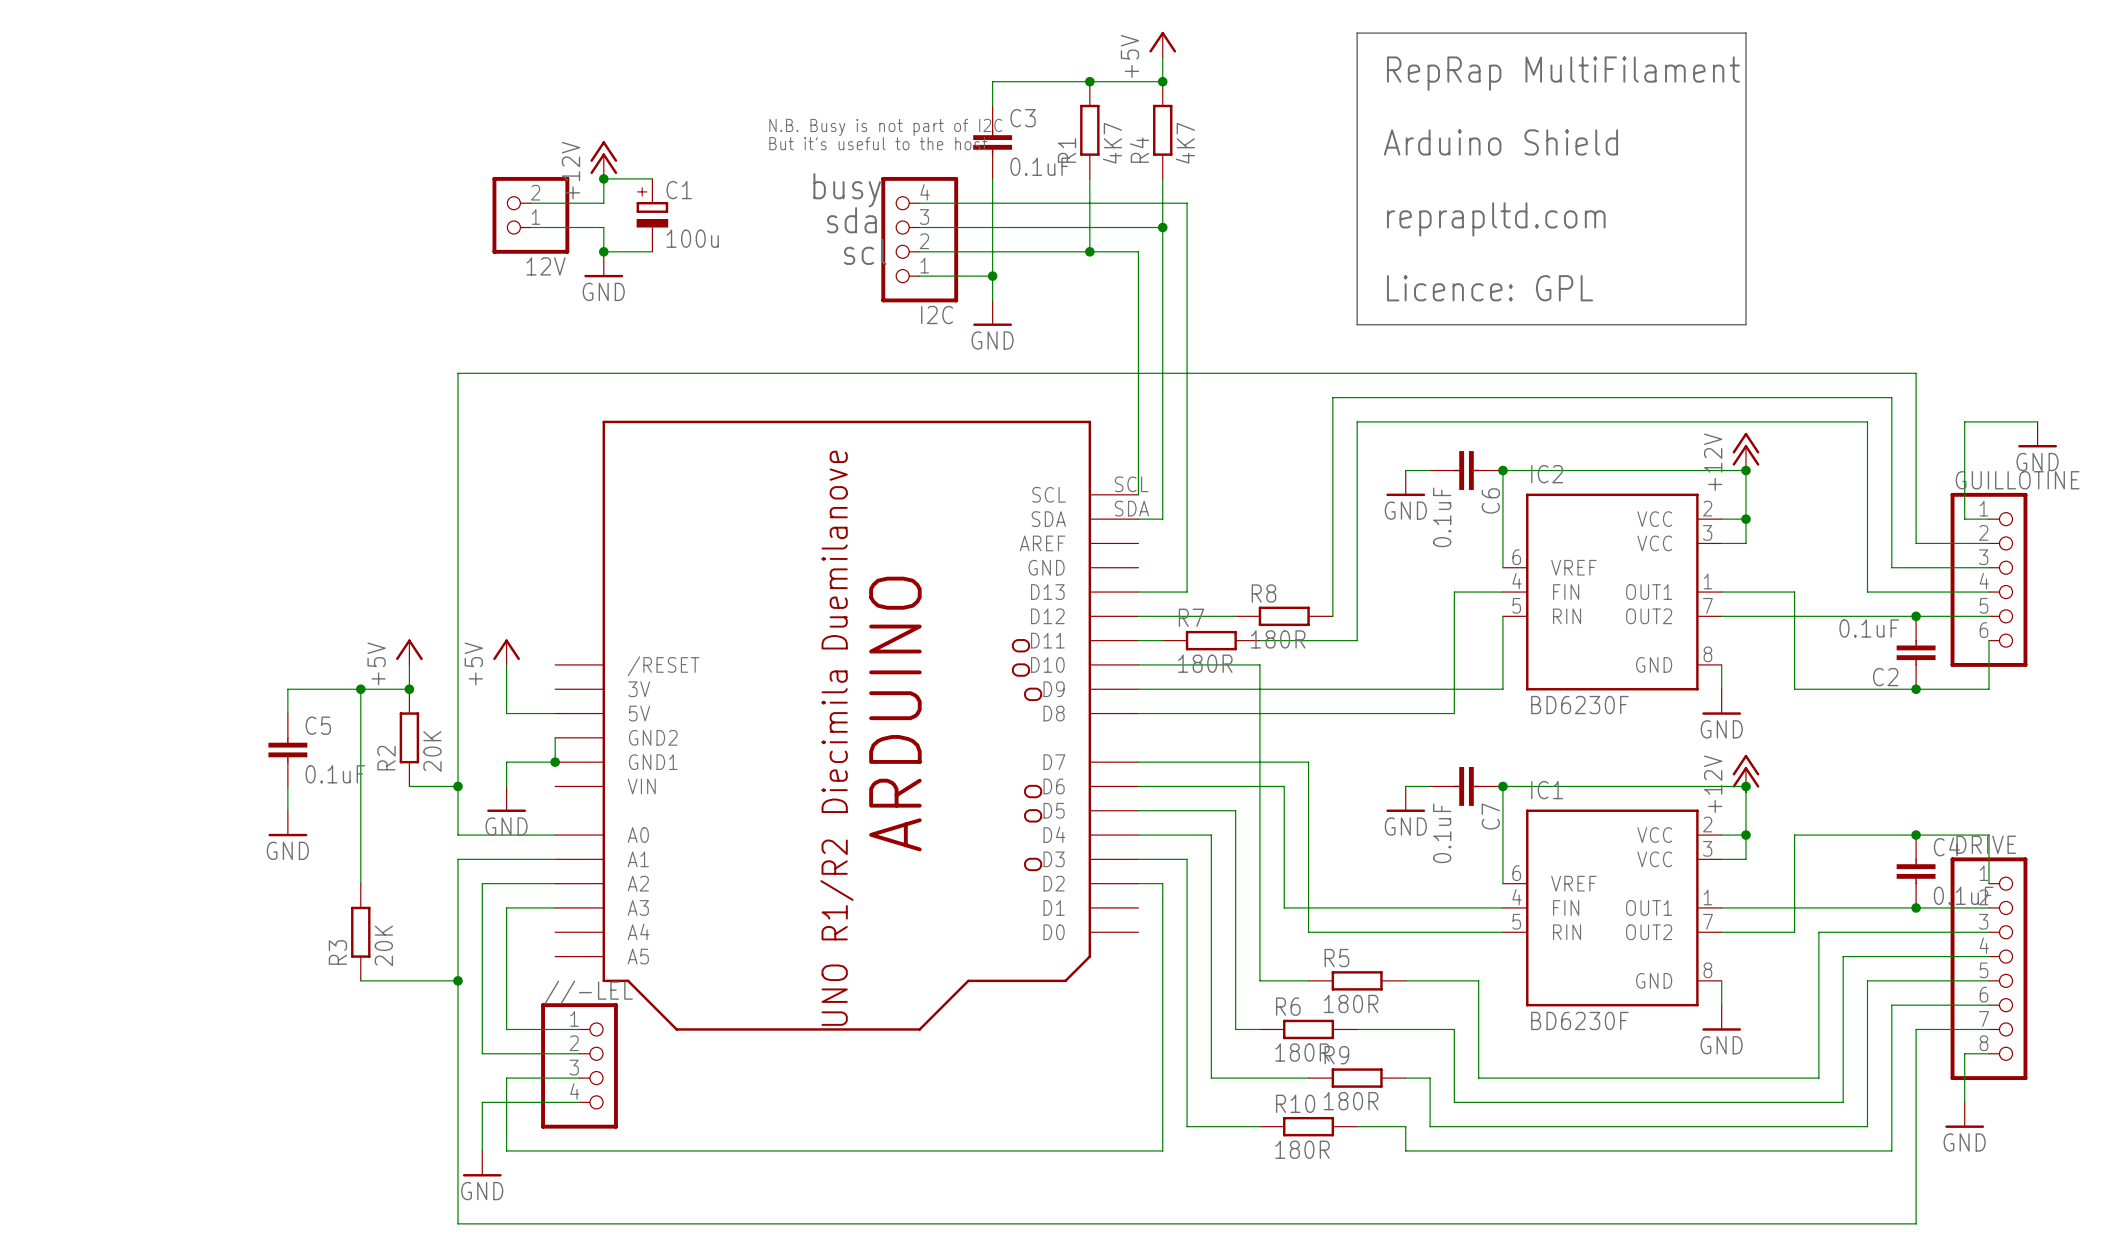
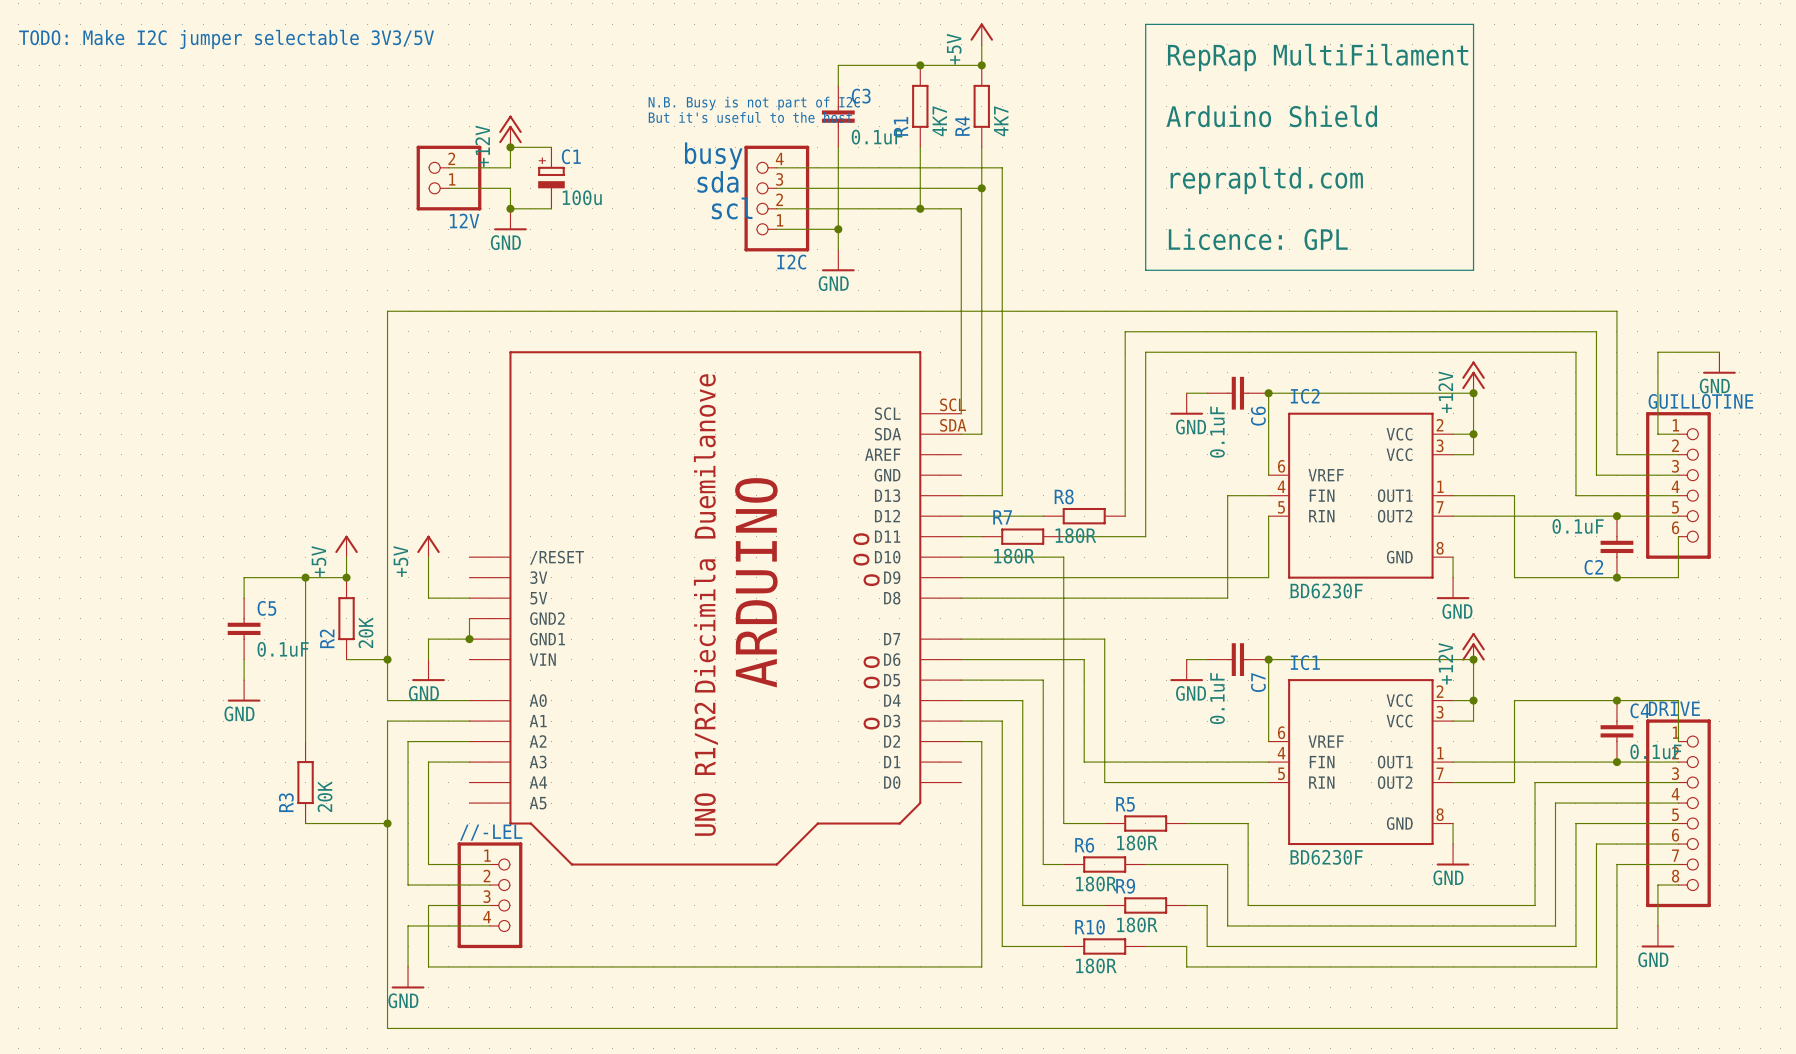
text: none -> TODO: Make I2C jumper selectable 3V3/5V (226, 39)

